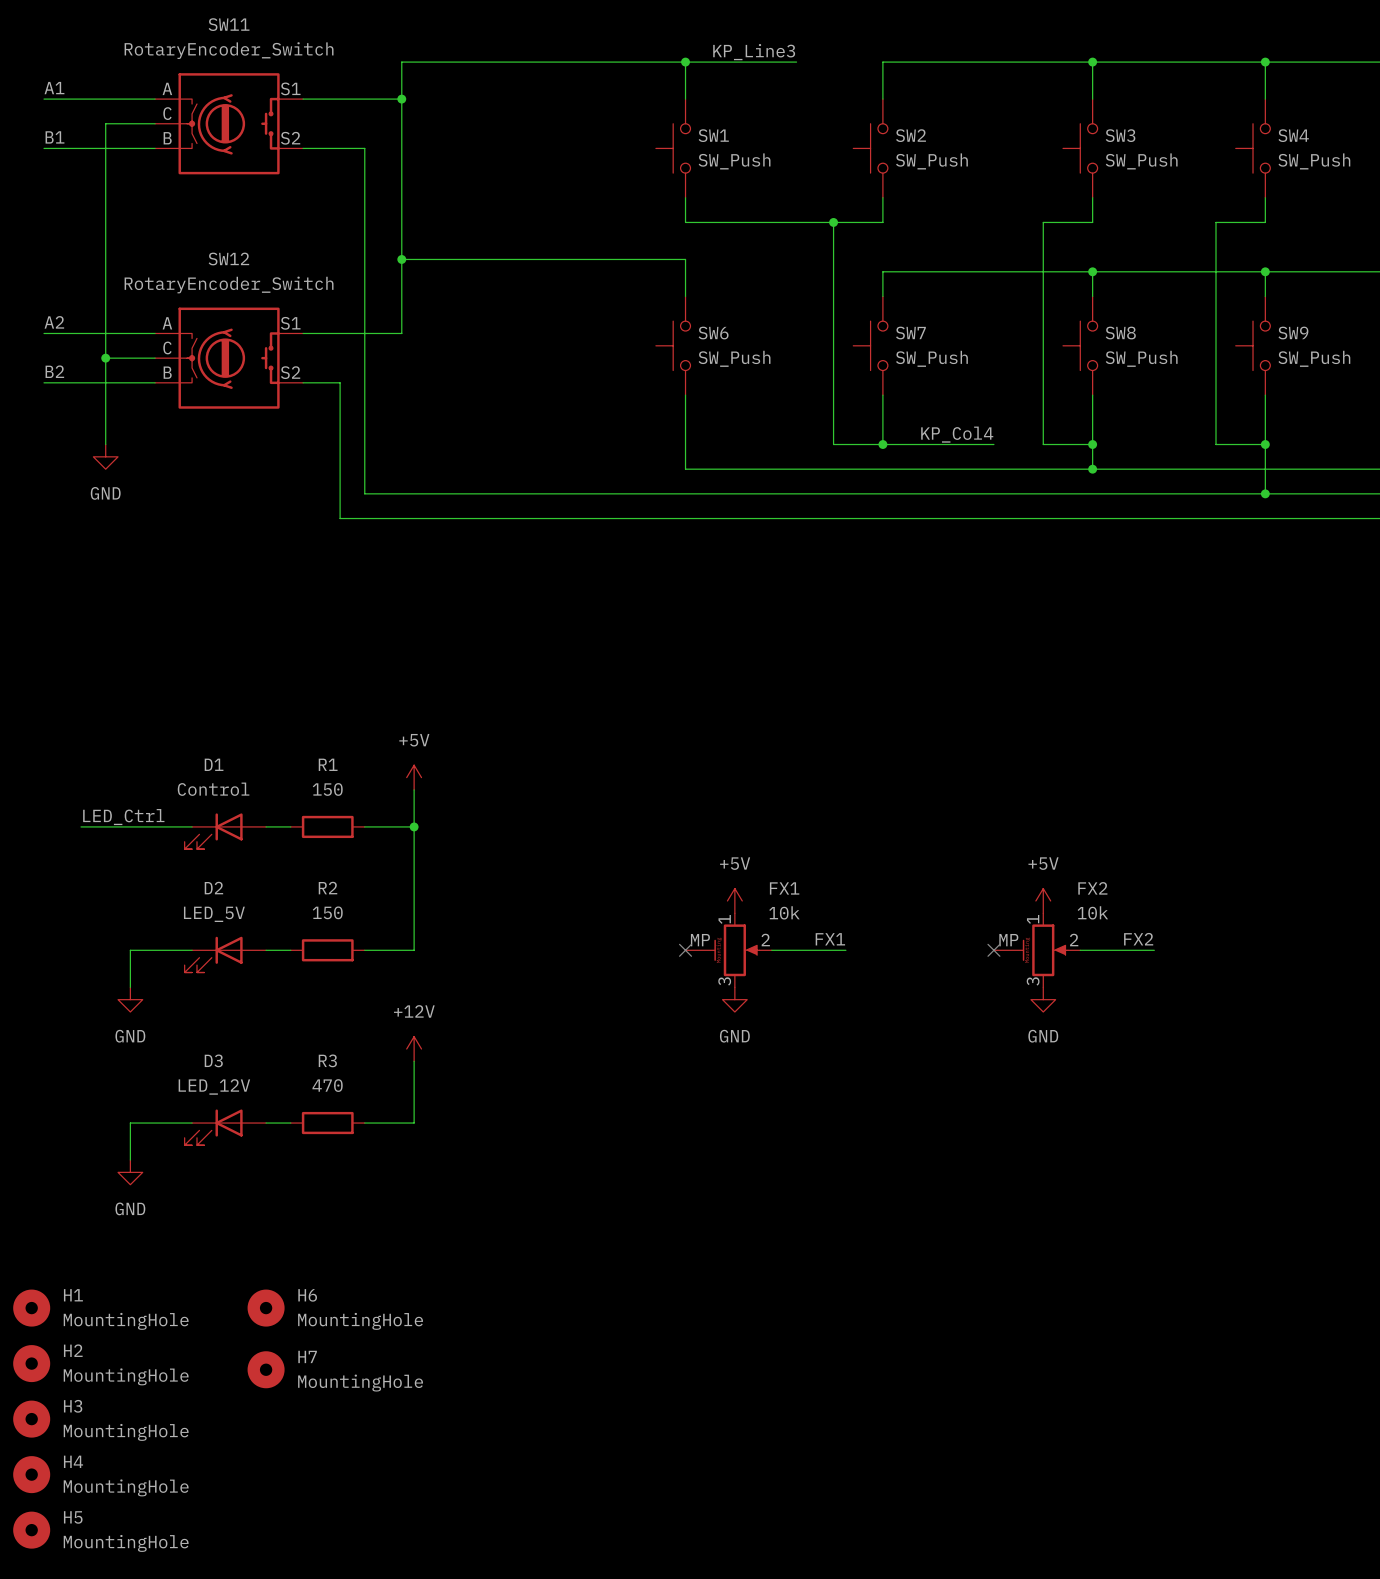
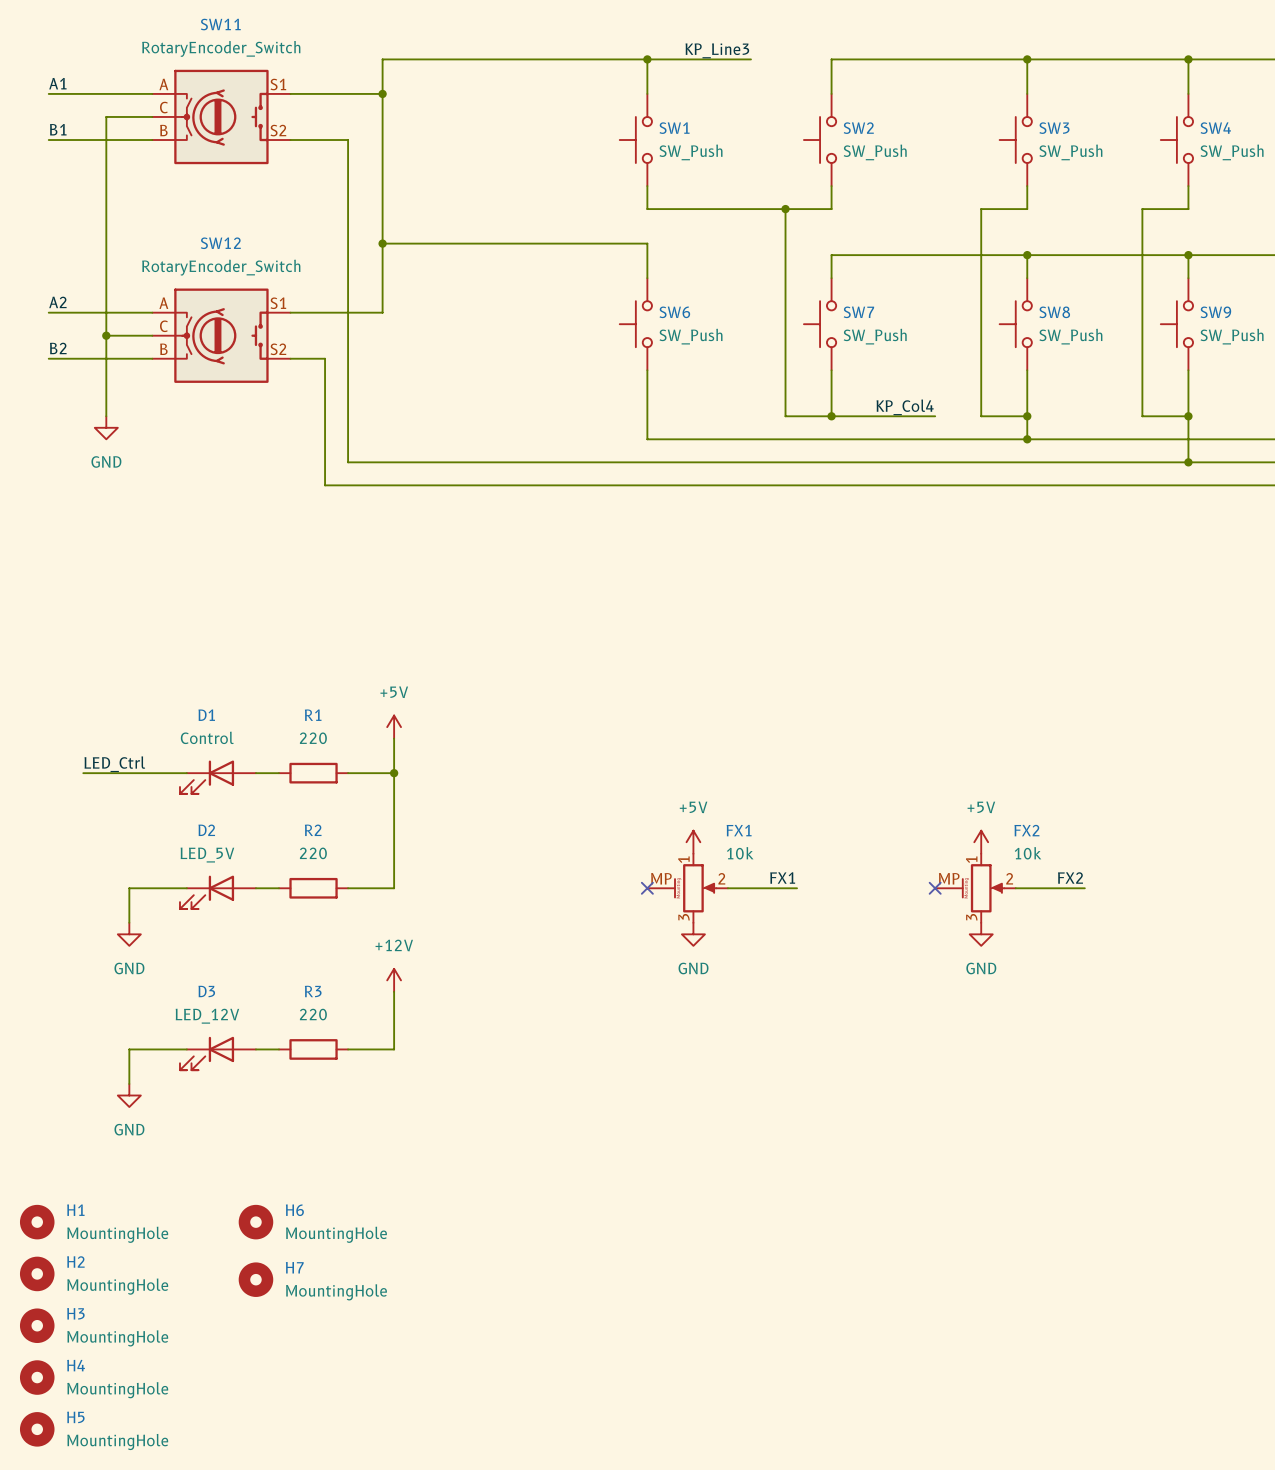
R1 value: 150 (327, 789) -> 220 (313, 738)
R2 value: 150 (327, 912) -> 220 (313, 853)
R3 value: 470 (327, 1085) -> 220 (313, 1014)

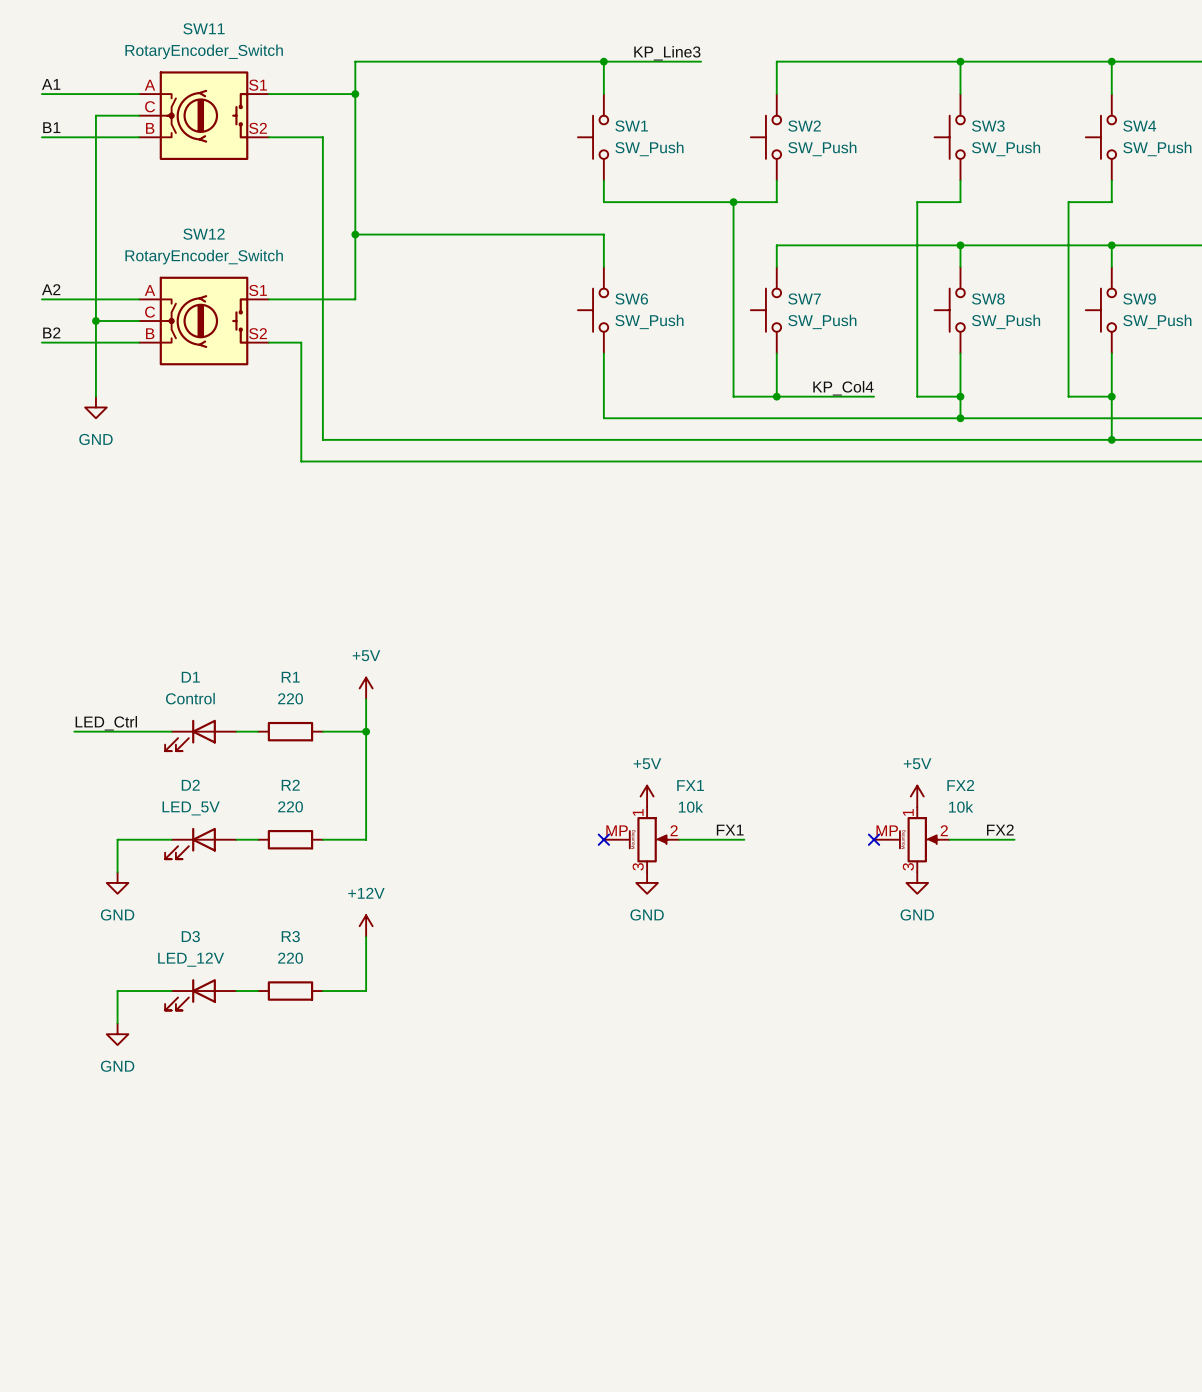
H1: MountingHole (37, 1222) -> none
H6: MountingHole (255, 1222) -> none
H2: MountingHole (37, 1273) -> none
H7: MountingHole (255, 1279) -> none
H3: MountingHole (37, 1325) -> none
H4: MountingHole (37, 1377) -> none
H5: MountingHole (37, 1429) -> none

